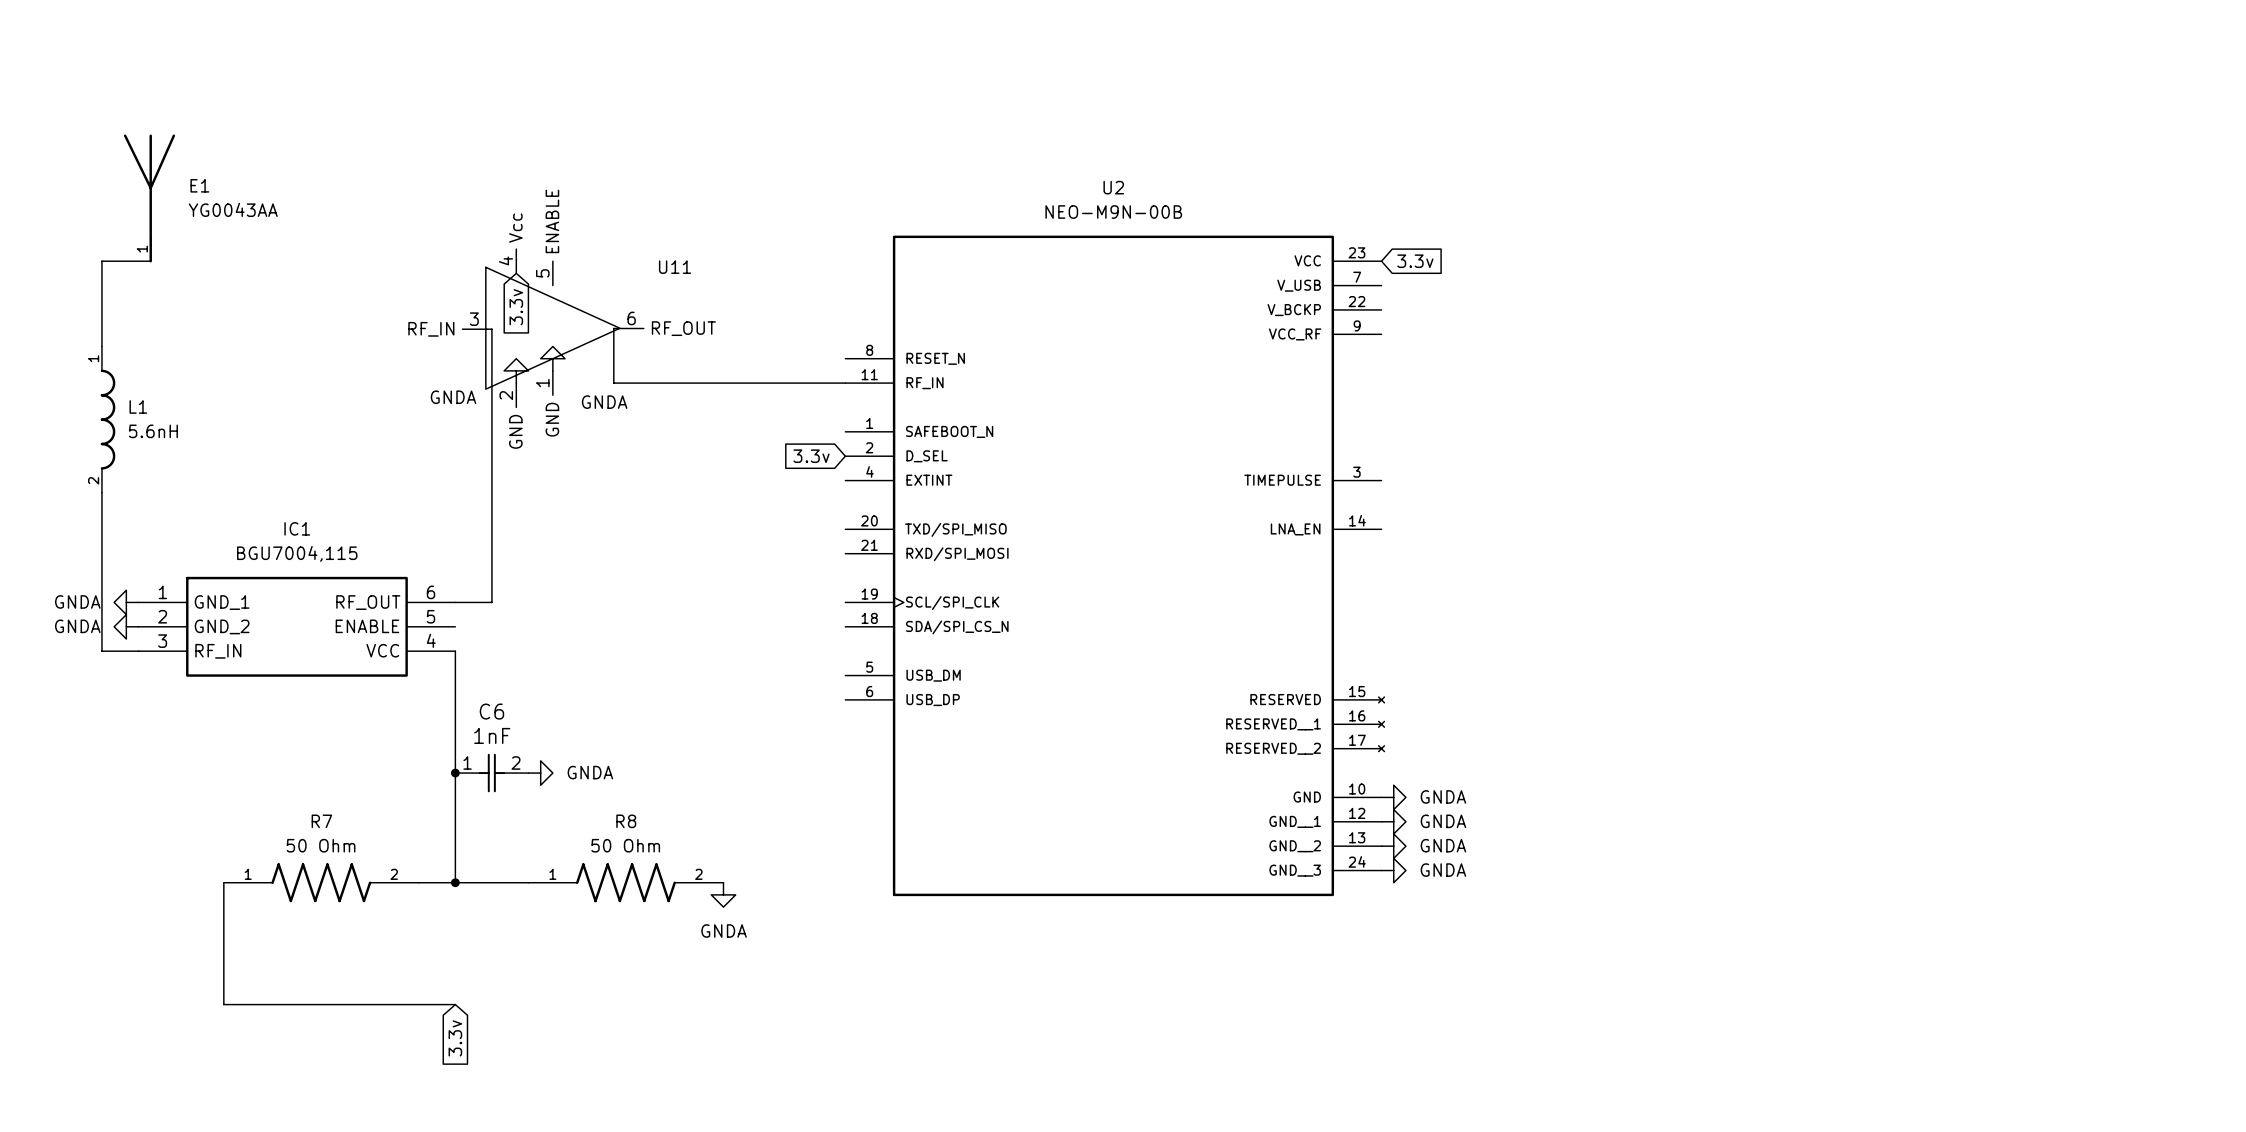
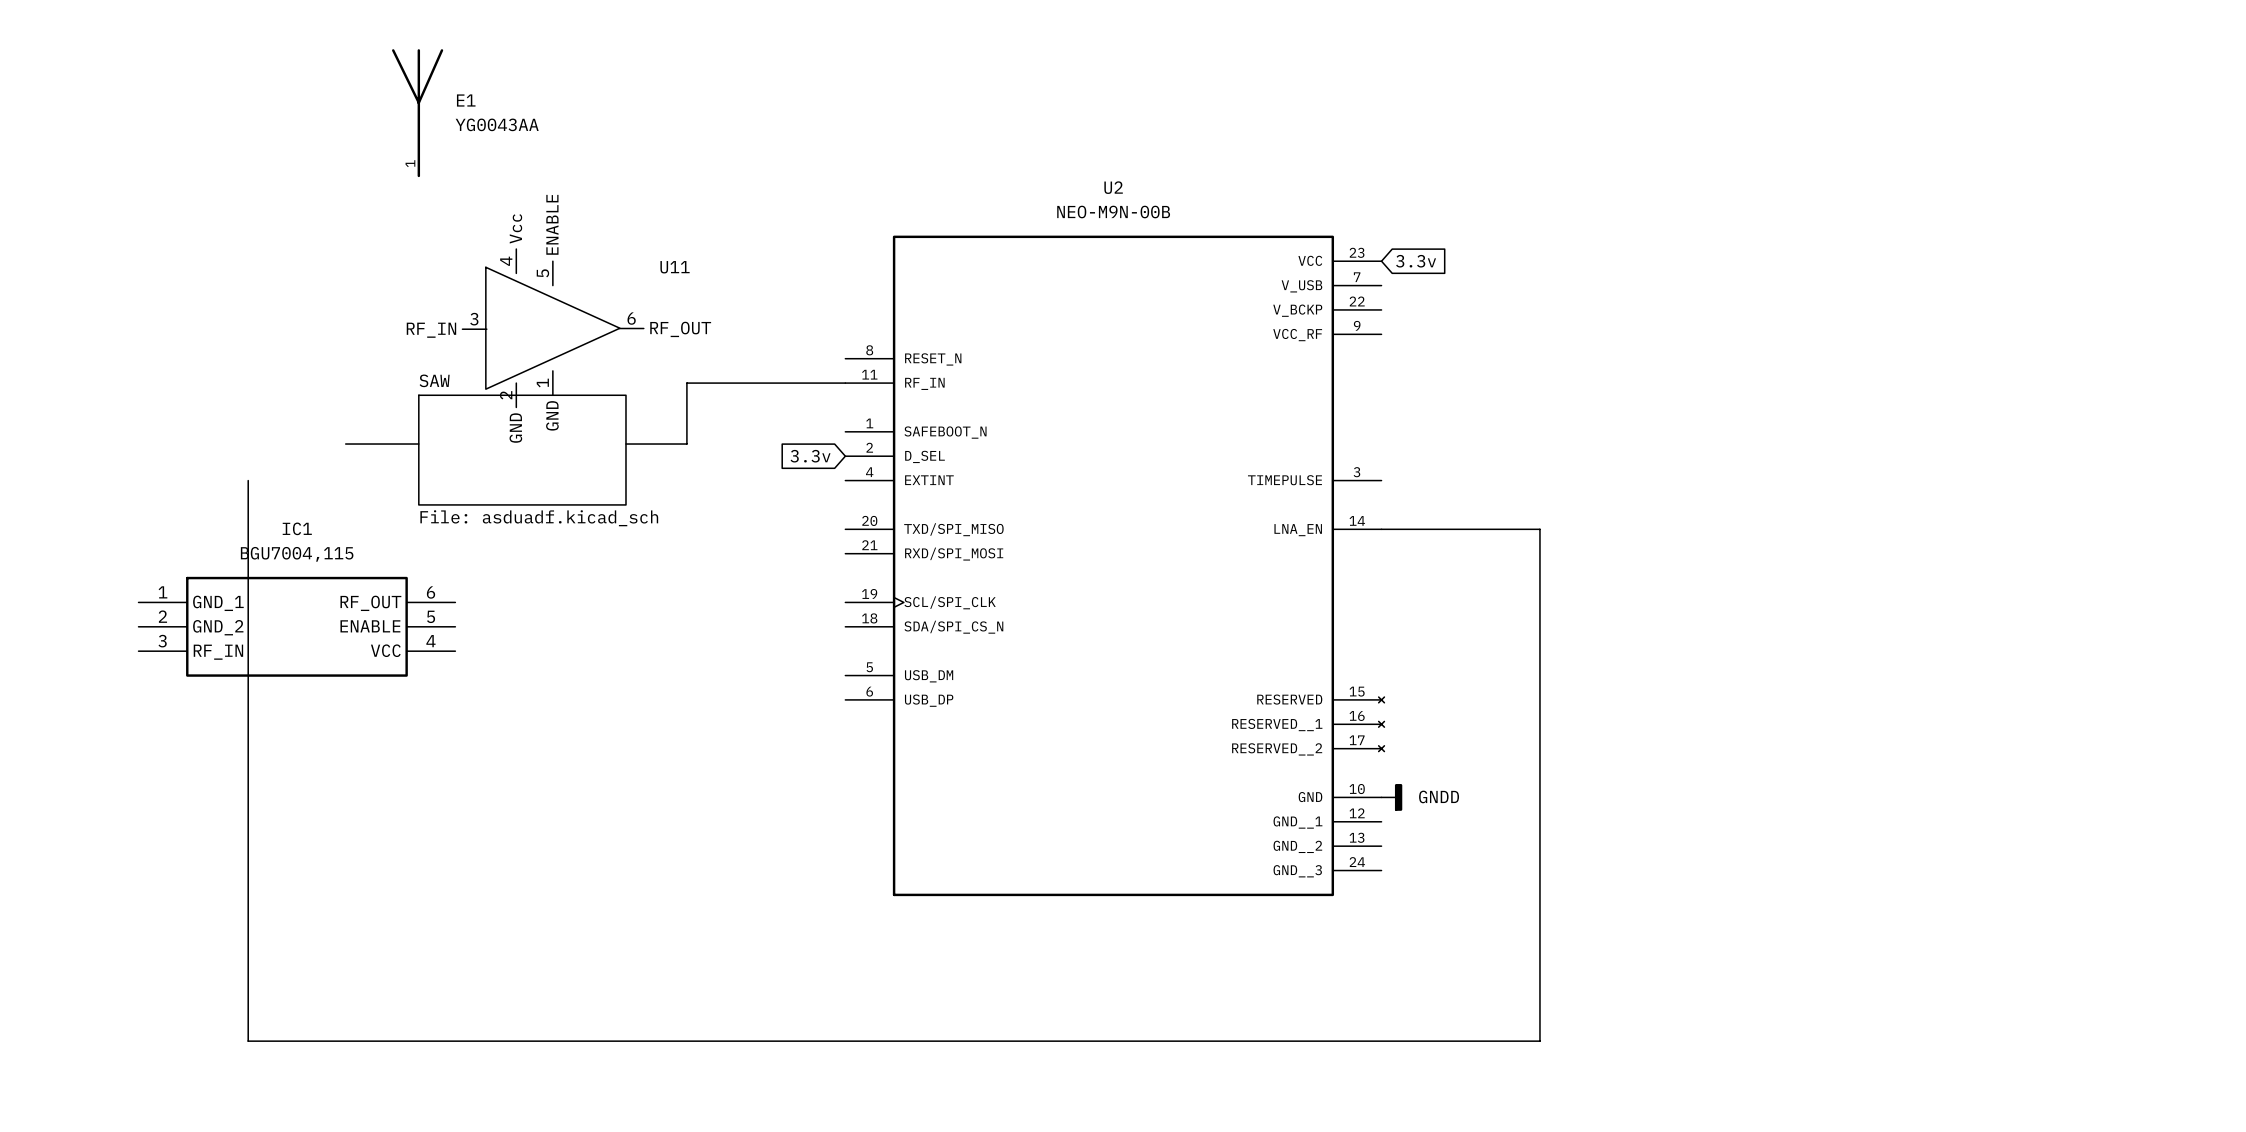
E1 position: (149, 198) -> (417, 113)
wire: (150, 261) (101, 261) (101, 346) -> none
global label: 3.3v (516, 307) -> none
wire: (619, 328) (613, 328) (613, 383) (686, 383) -> (625, 444) (686, 444) (686, 383)
wire: (486, 329) (491, 329) (491, 602) (455, 602) -> none
power symbol: GNDA (552, 358) -> none
power symbol: GNDA (516, 370) -> none
L1: 5.6nH (108, 419) -> none
wire: none -> (345, 444) (418, 444)
sheet SAW: none -> File: asduadf.kicad_sch (522, 450)
wire: none -> (248, 480) (248, 1041) (1539, 1041) (1539, 529) (1381, 529)
wire: (101, 492) (101, 651) (138, 651) -> none
power symbol: GNDA (126, 602) -> none
power symbol: GNDA (126, 626) -> none
wire: (455, 651) (455, 882) -> none
junction: (455, 773) -> none
C6: 1nF (491, 773) -> none
power symbol: GNDA (540, 773) -> none
power symbol: GNDA (1393, 797) -> GNDD (1391, 797)
power symbol: GNDA (1393, 821) -> none
power symbol: GNDA (1393, 846) -> none
power symbol: GNDA (1393, 870) -> none
wire: (223, 882) (223, 1004) (455, 1004) -> none
R7: 50 Ohm (321, 882) -> none
wire: (418, 882) (528, 882) -> none
junction: (455, 882) -> none
R8: 50 Ohm (625, 882) -> none
power symbol: GNDA (723, 894) -> none
global label: 3.3v (455, 1038) -> none

